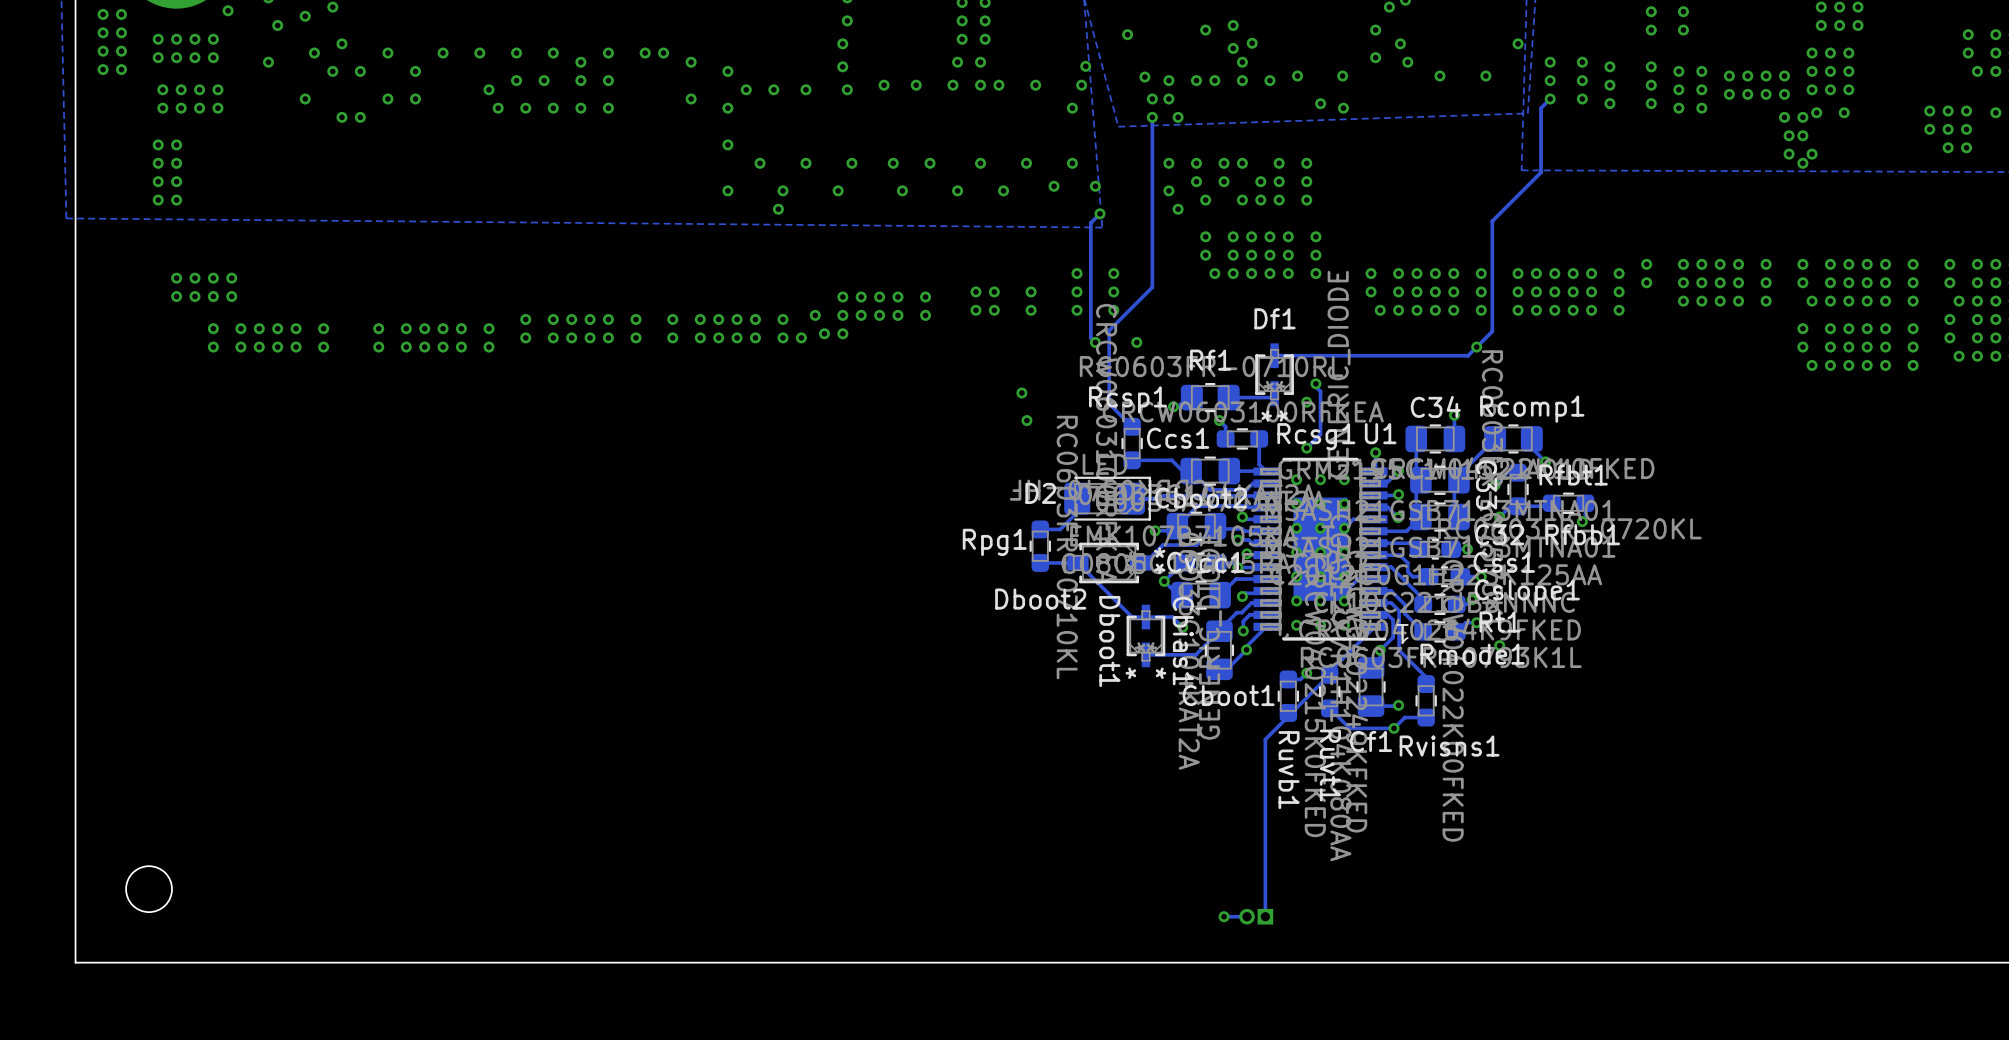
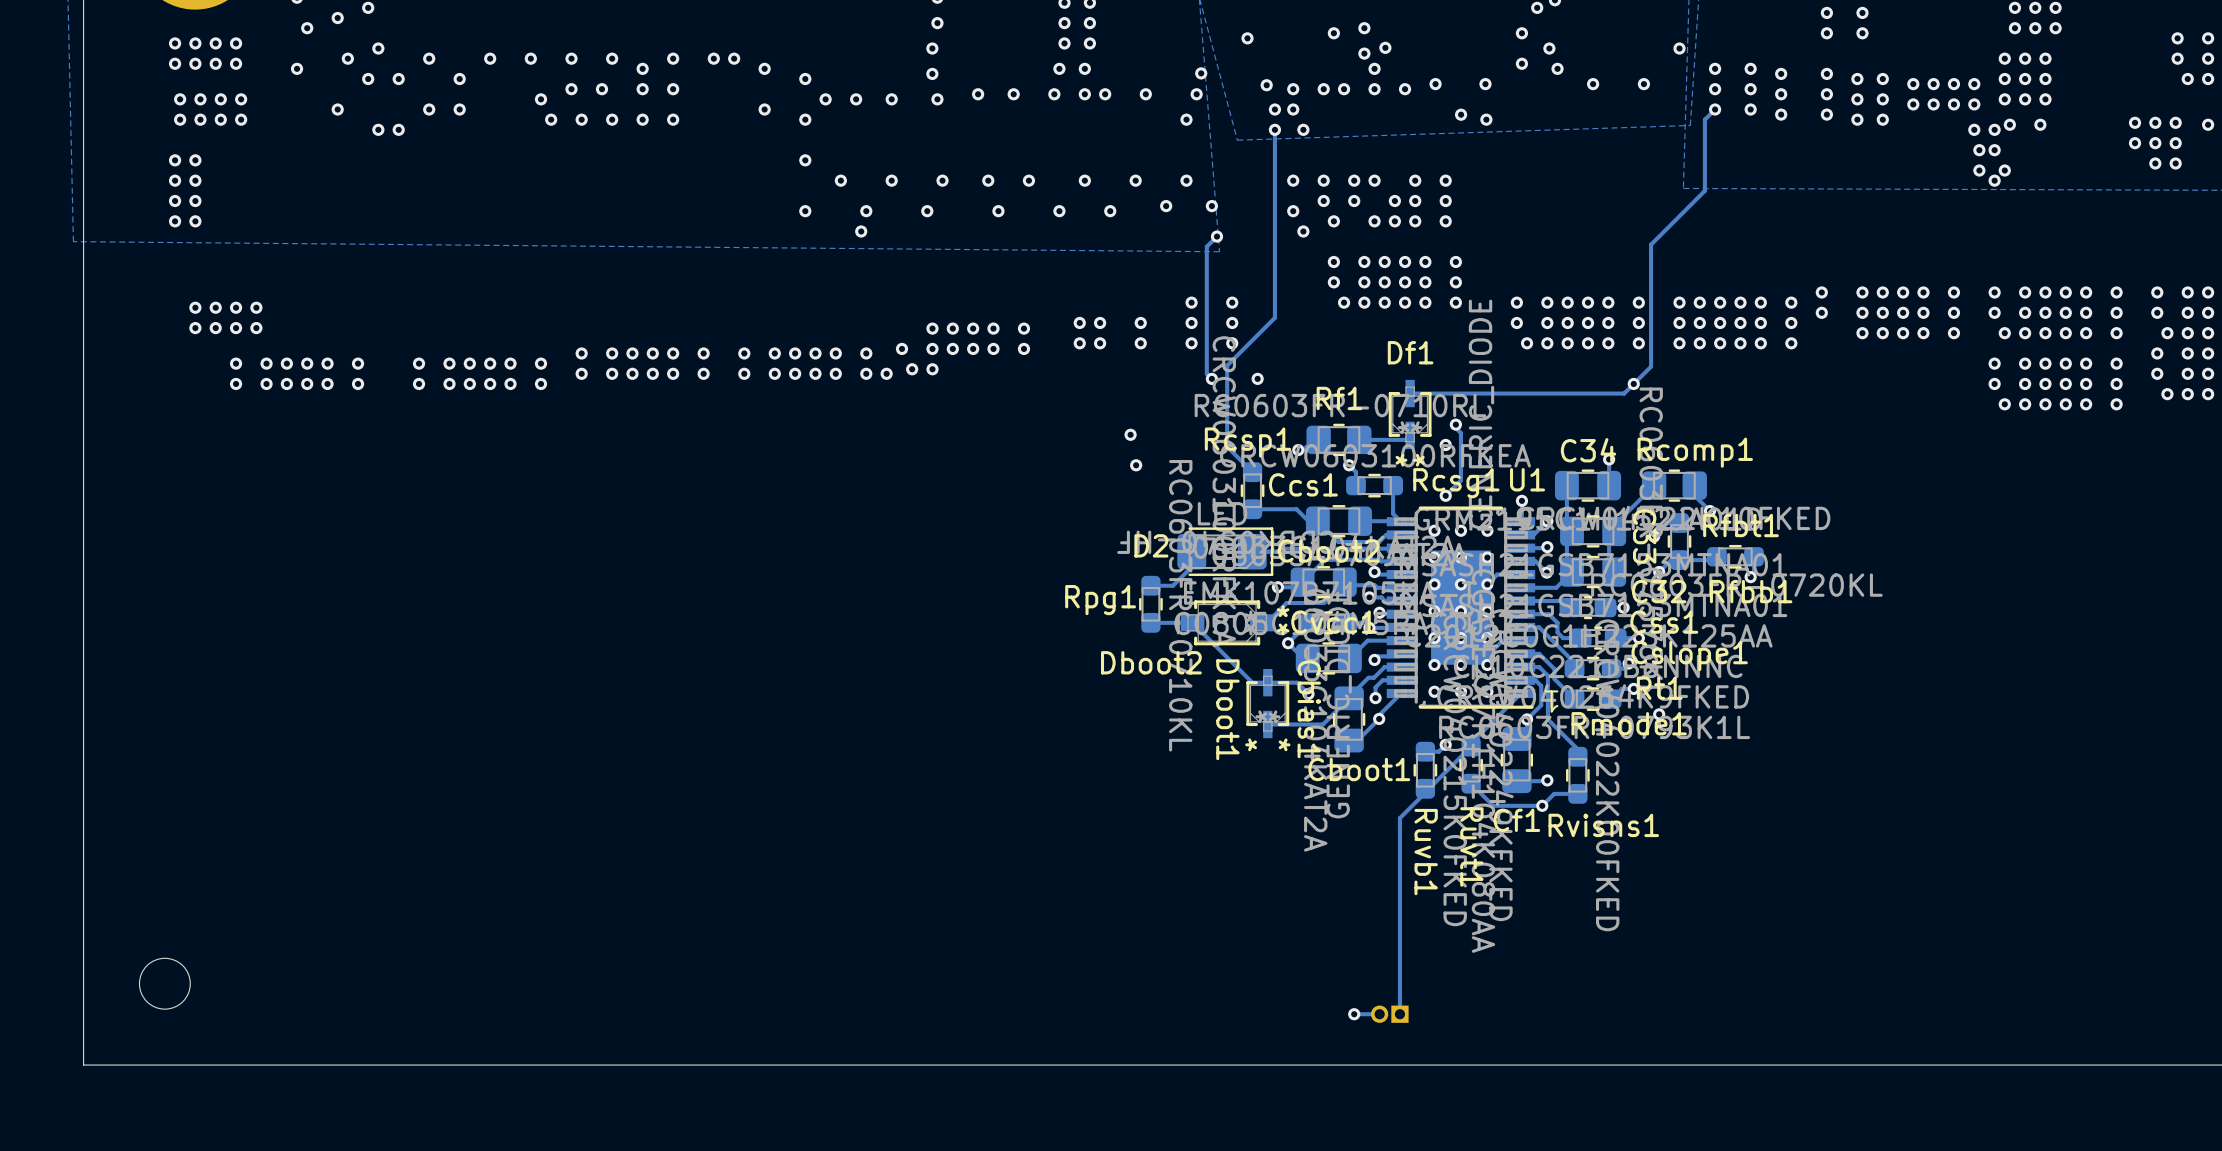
via: (228, 10) -> none
via: (103, 14) -> none
via: (121, 14) -> none
via: (103, 32) -> none
via: (121, 32) -> none
via: (103, 51) -> none
via: (121, 51) -> none
via: (103, 69) -> none
via: (121, 69) -> none

